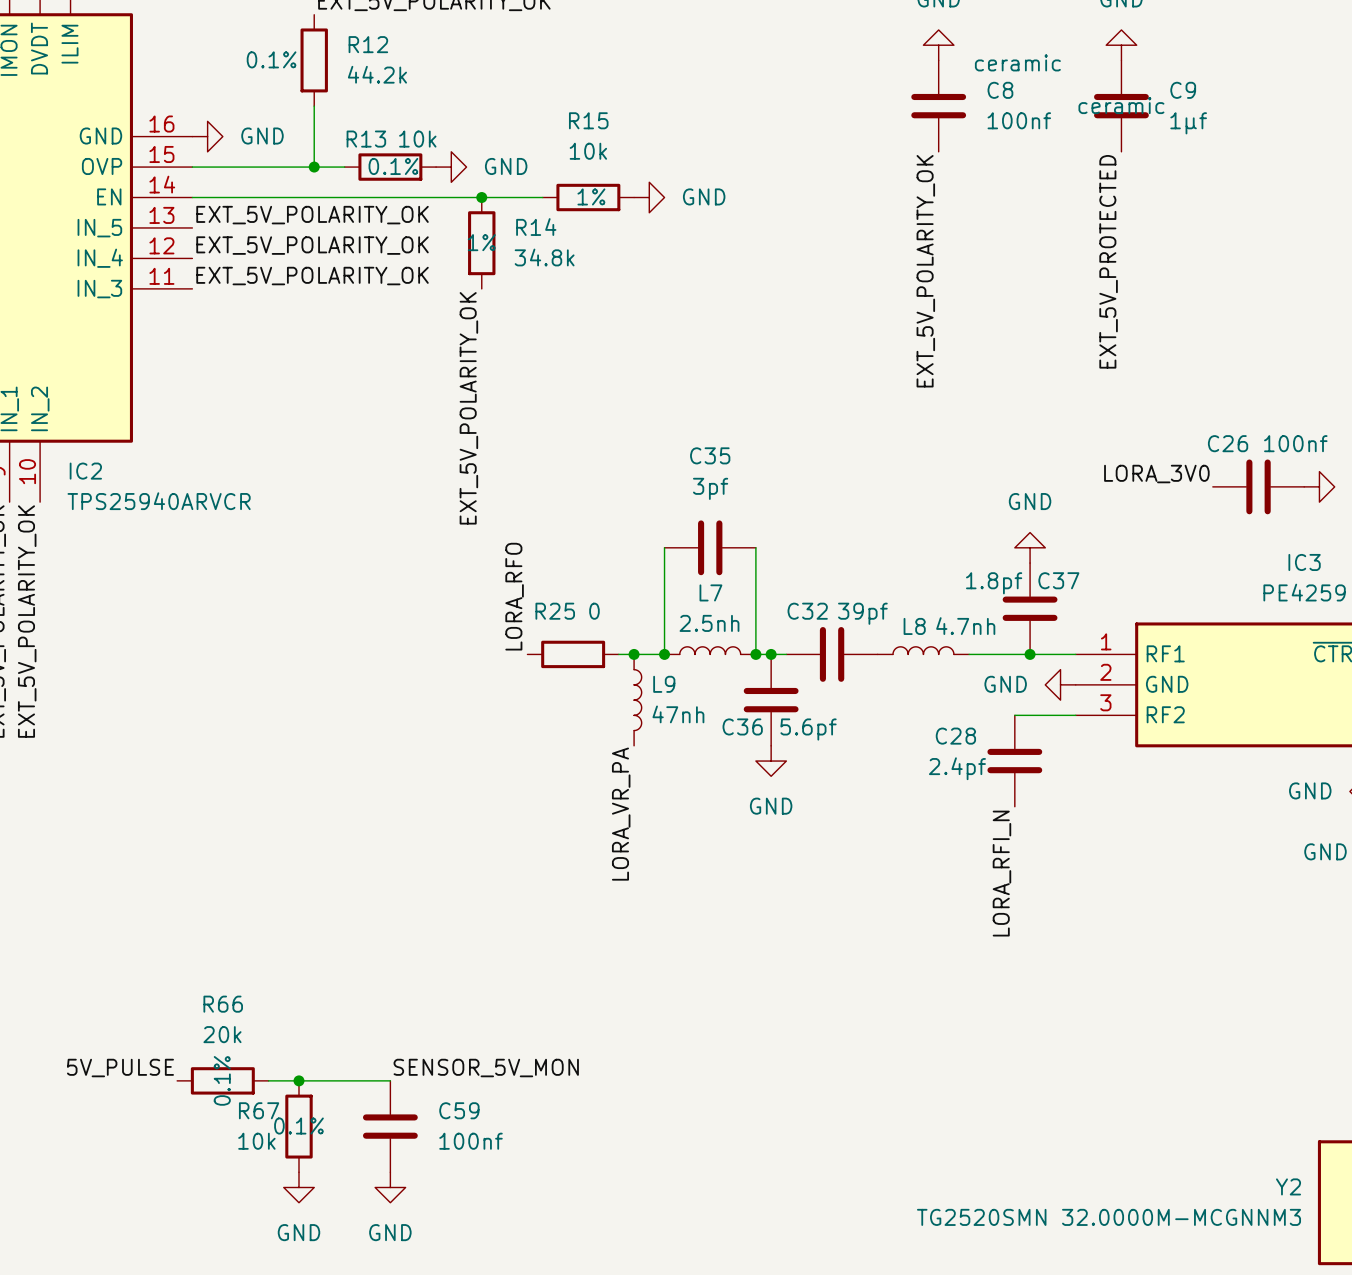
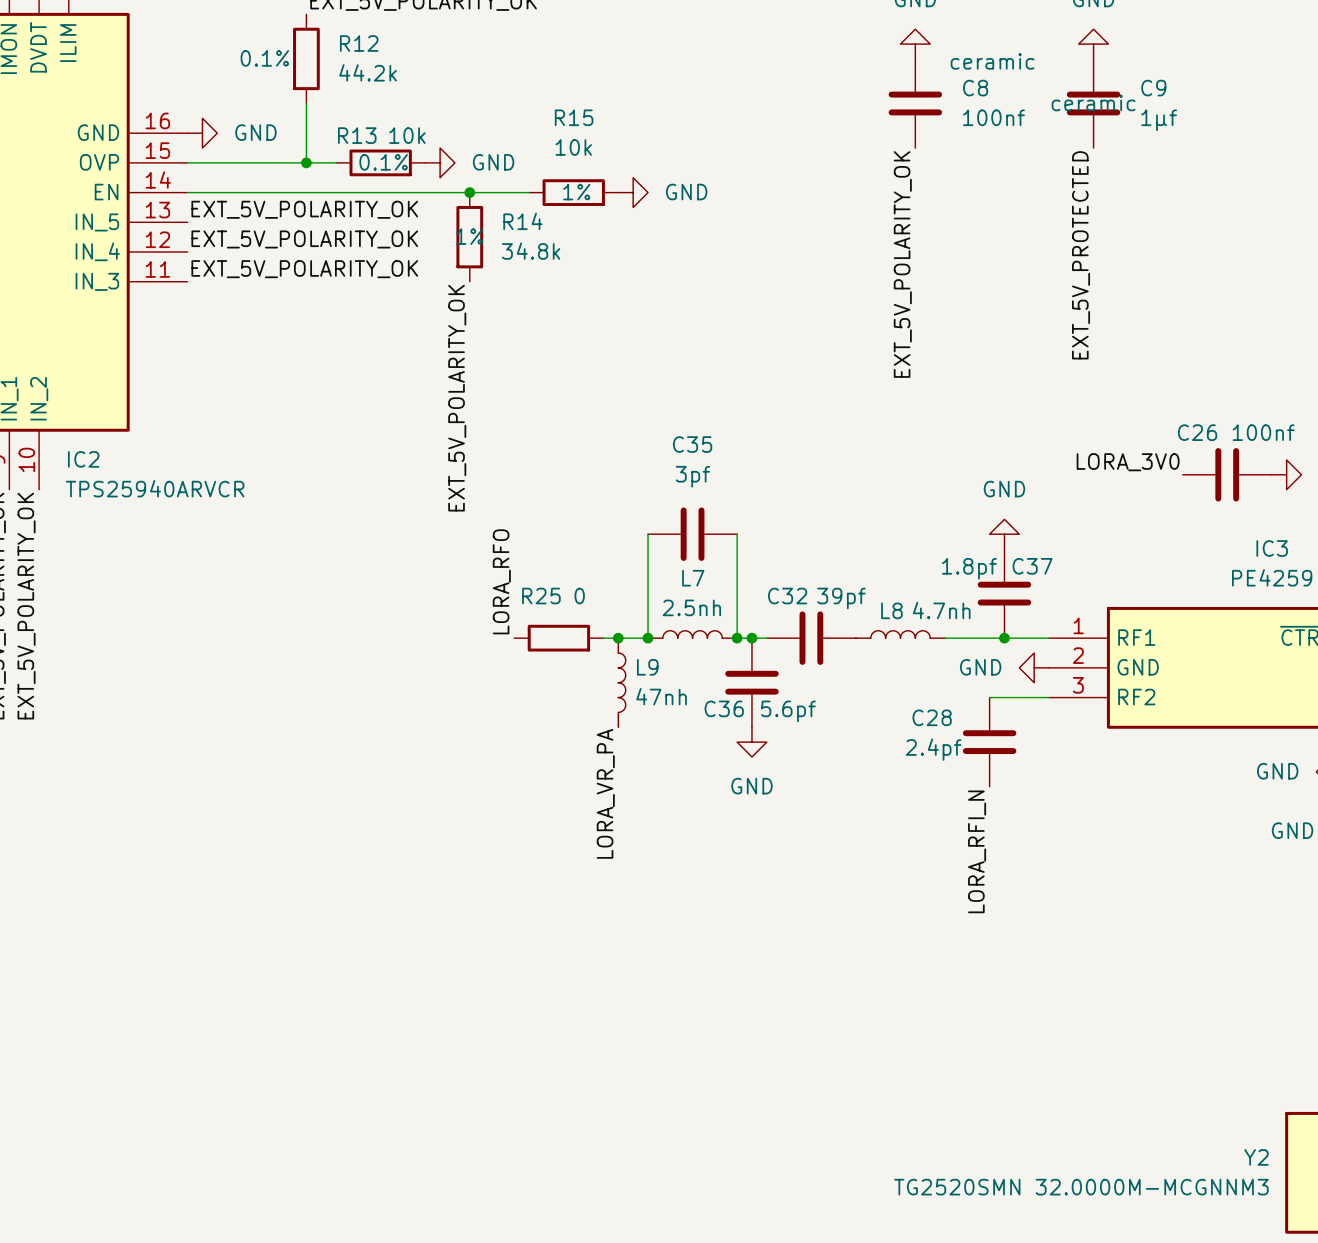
label: 5V_PULSE (120, 1068) -> none
label: SENSOR_5V_MON (486, 1068) -> none
R66: 20k (222, 1080) -> none
wire: (268, 1080) (390, 1080) -> none
junction: (298, 1080) -> none
R67: 10k (298, 1126) -> none
C59: 100nf (390, 1126) -> none
power symbol: GND (298, 1187) -> none
power symbol: GND (390, 1187) -> none

